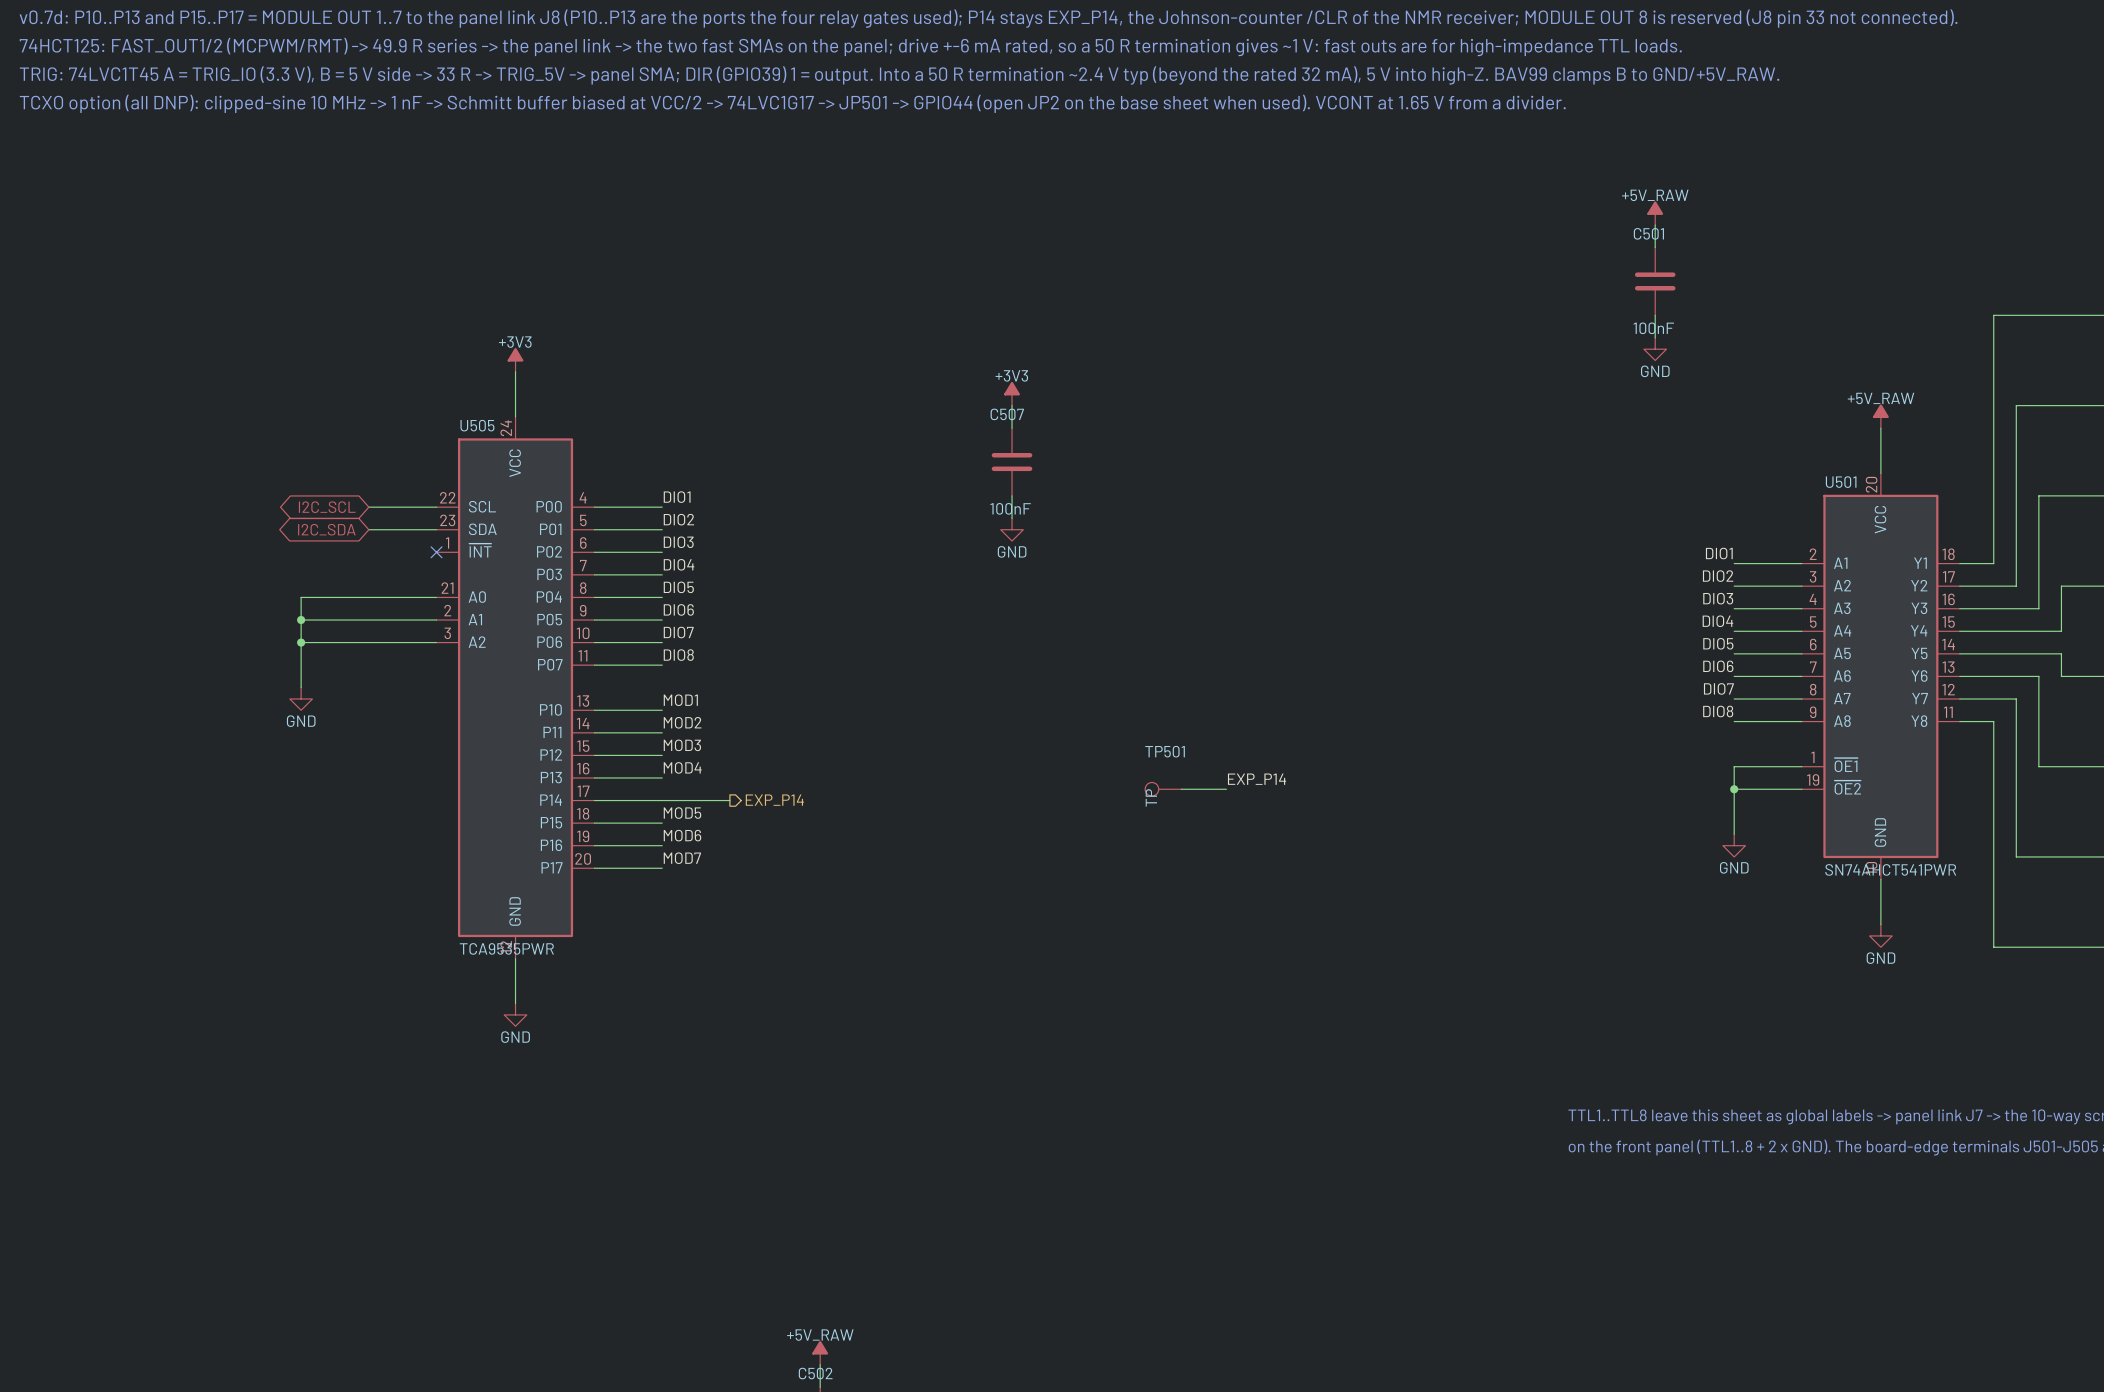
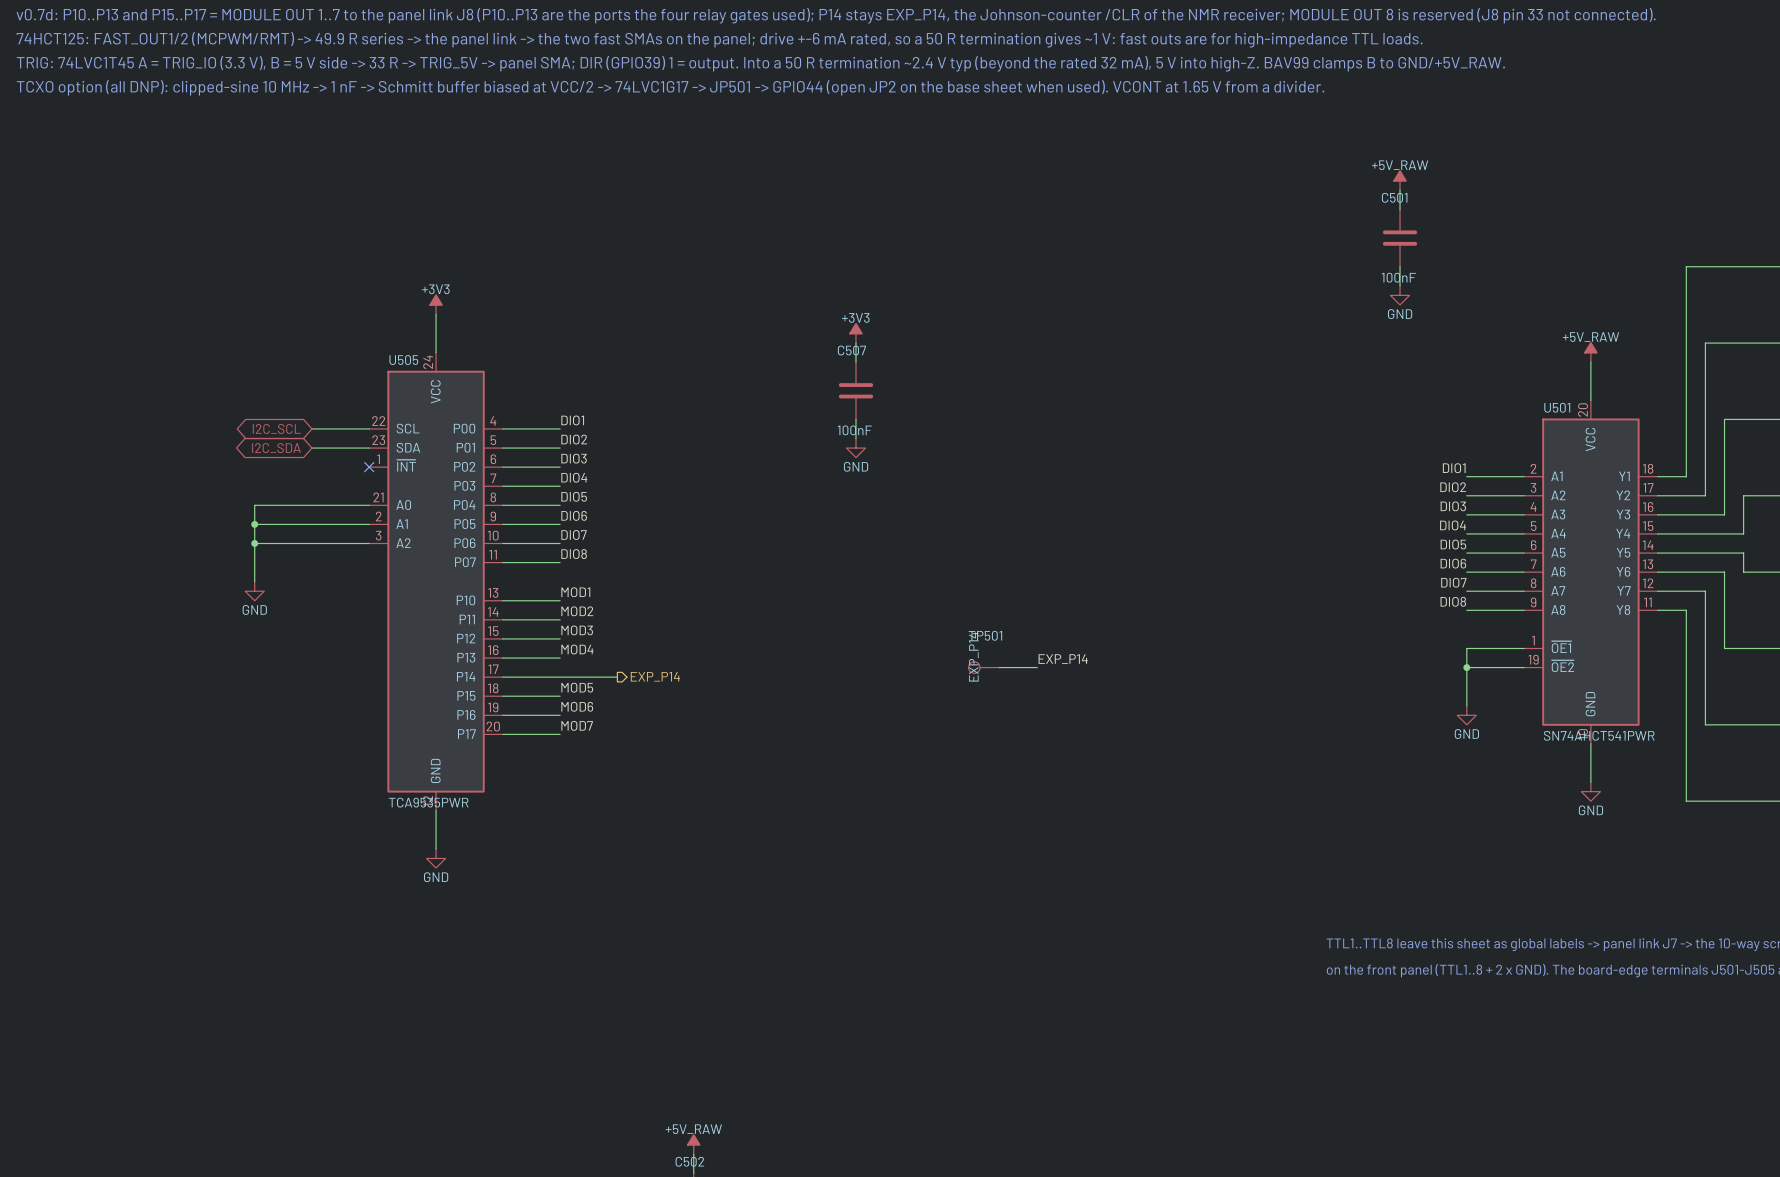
TP501 value: TP (1151, 797) -> EXP_P14 (973, 656)

